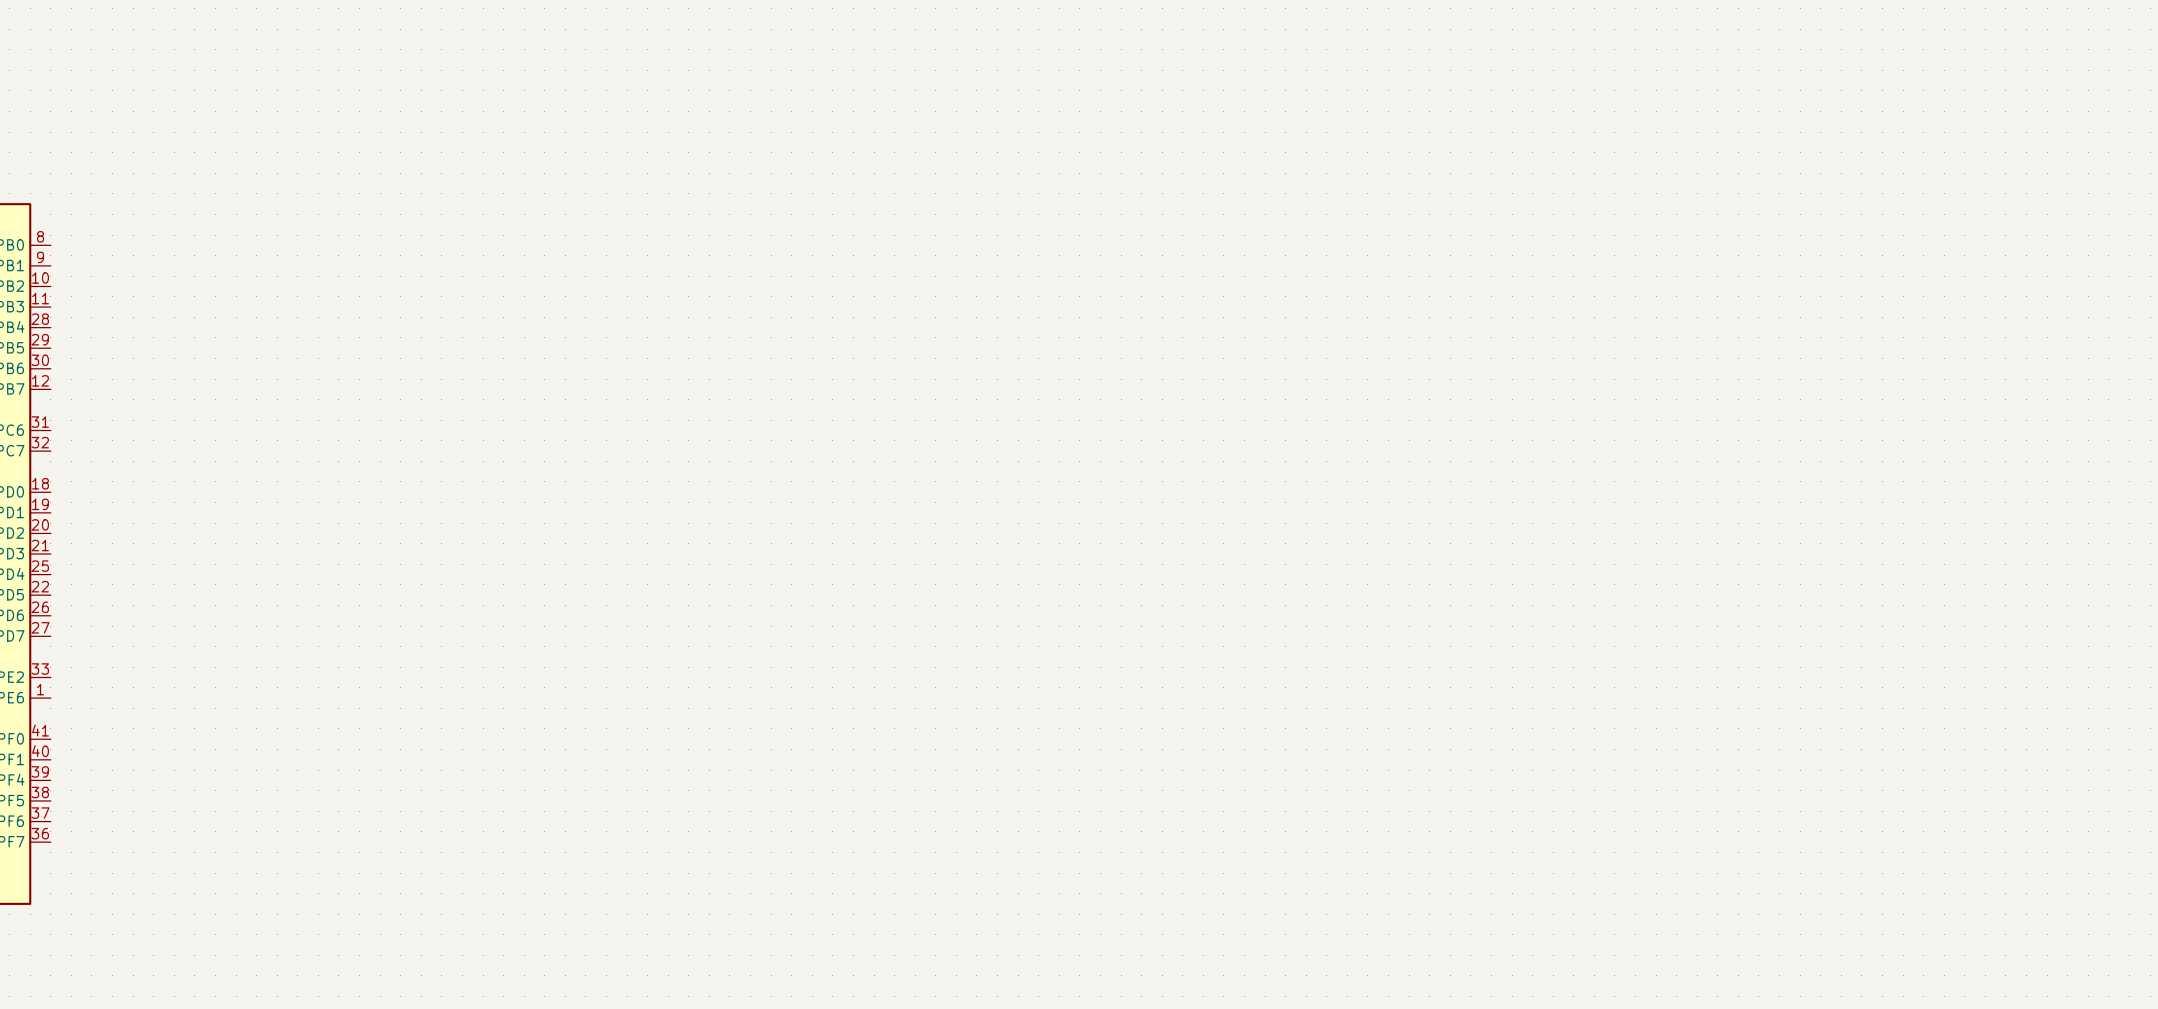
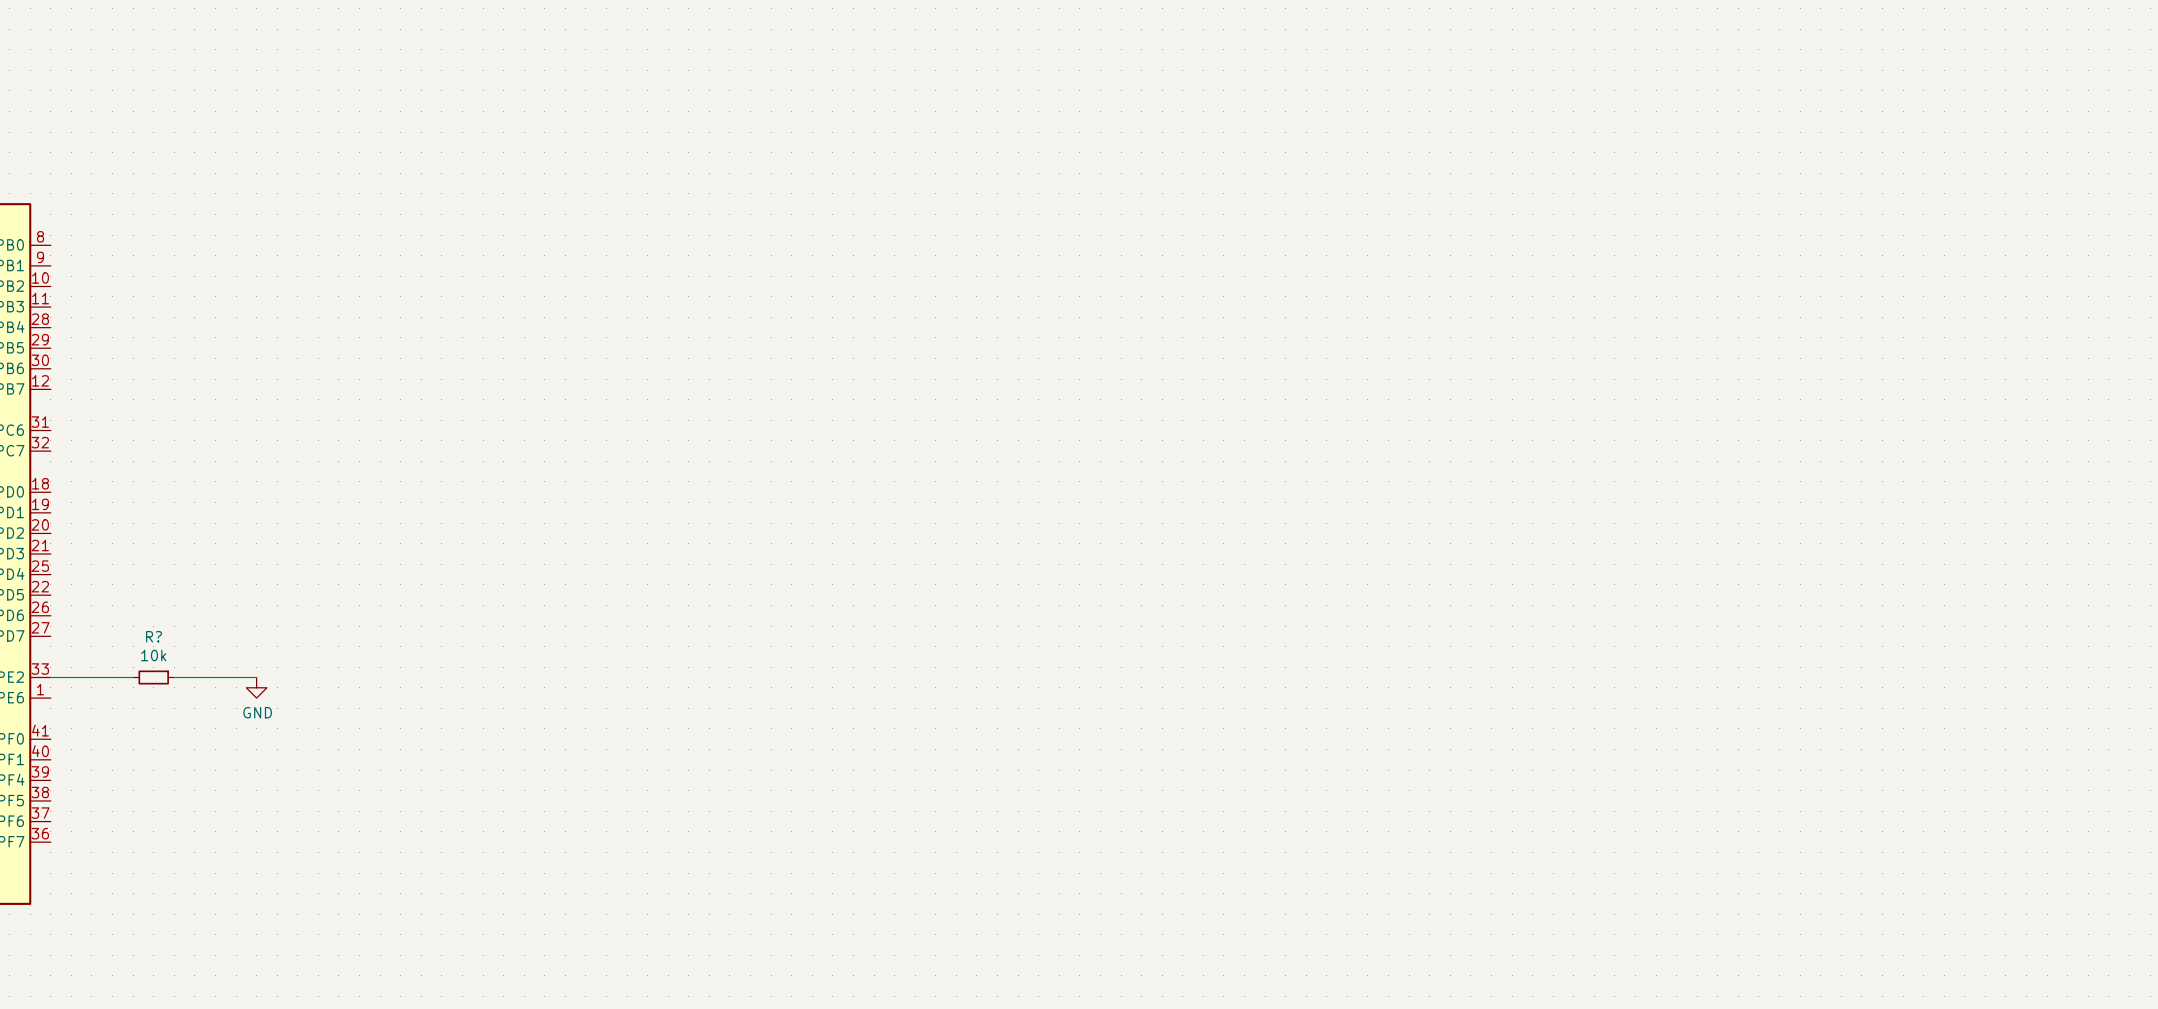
wire: none -> (50, 677) (133, 677)
R?: none -> 10k (153, 677)
wire: none -> (174, 677) (256, 677)
power symbol: none -> GND (256, 687)

